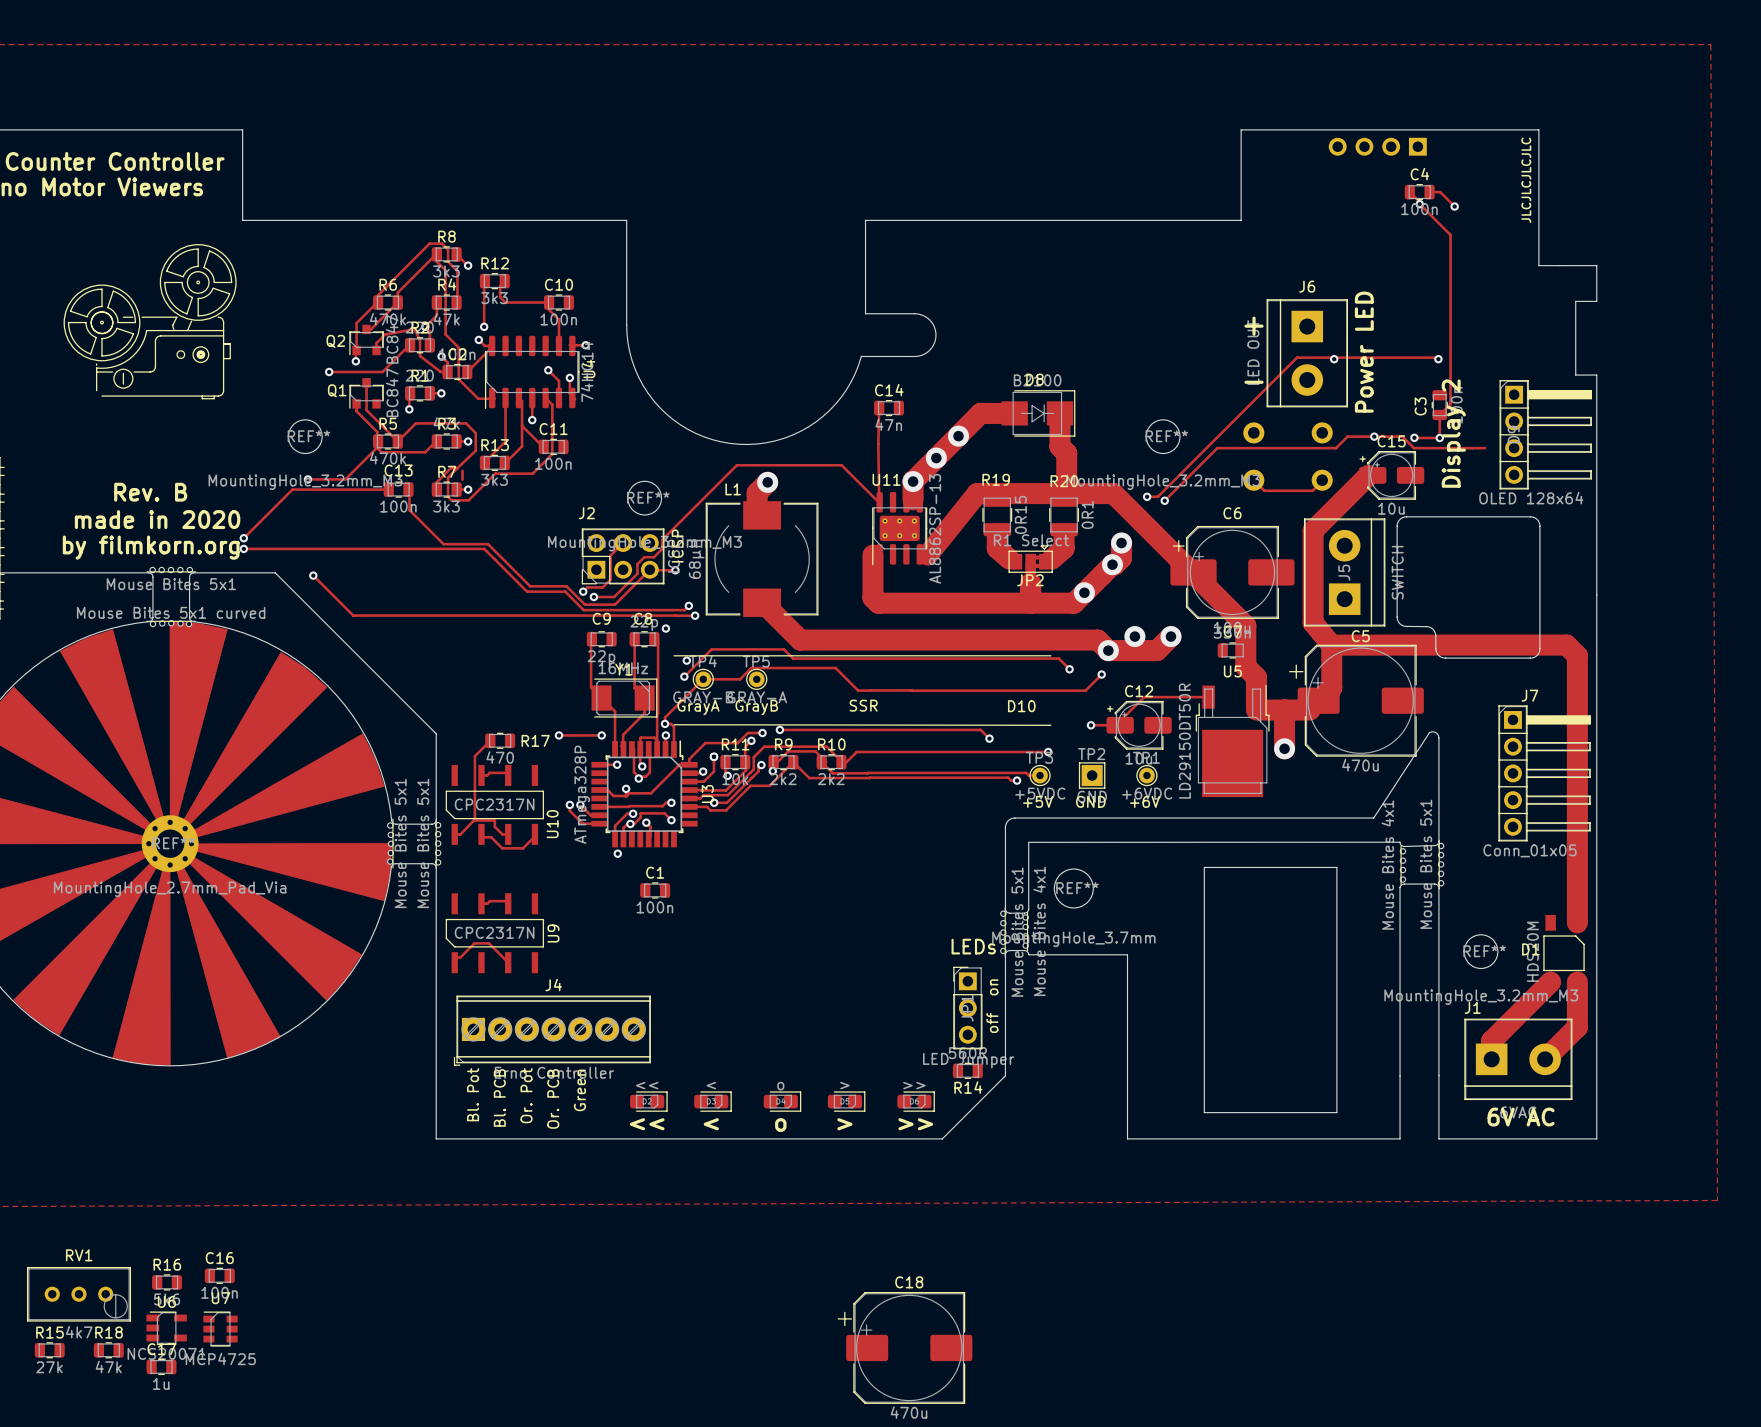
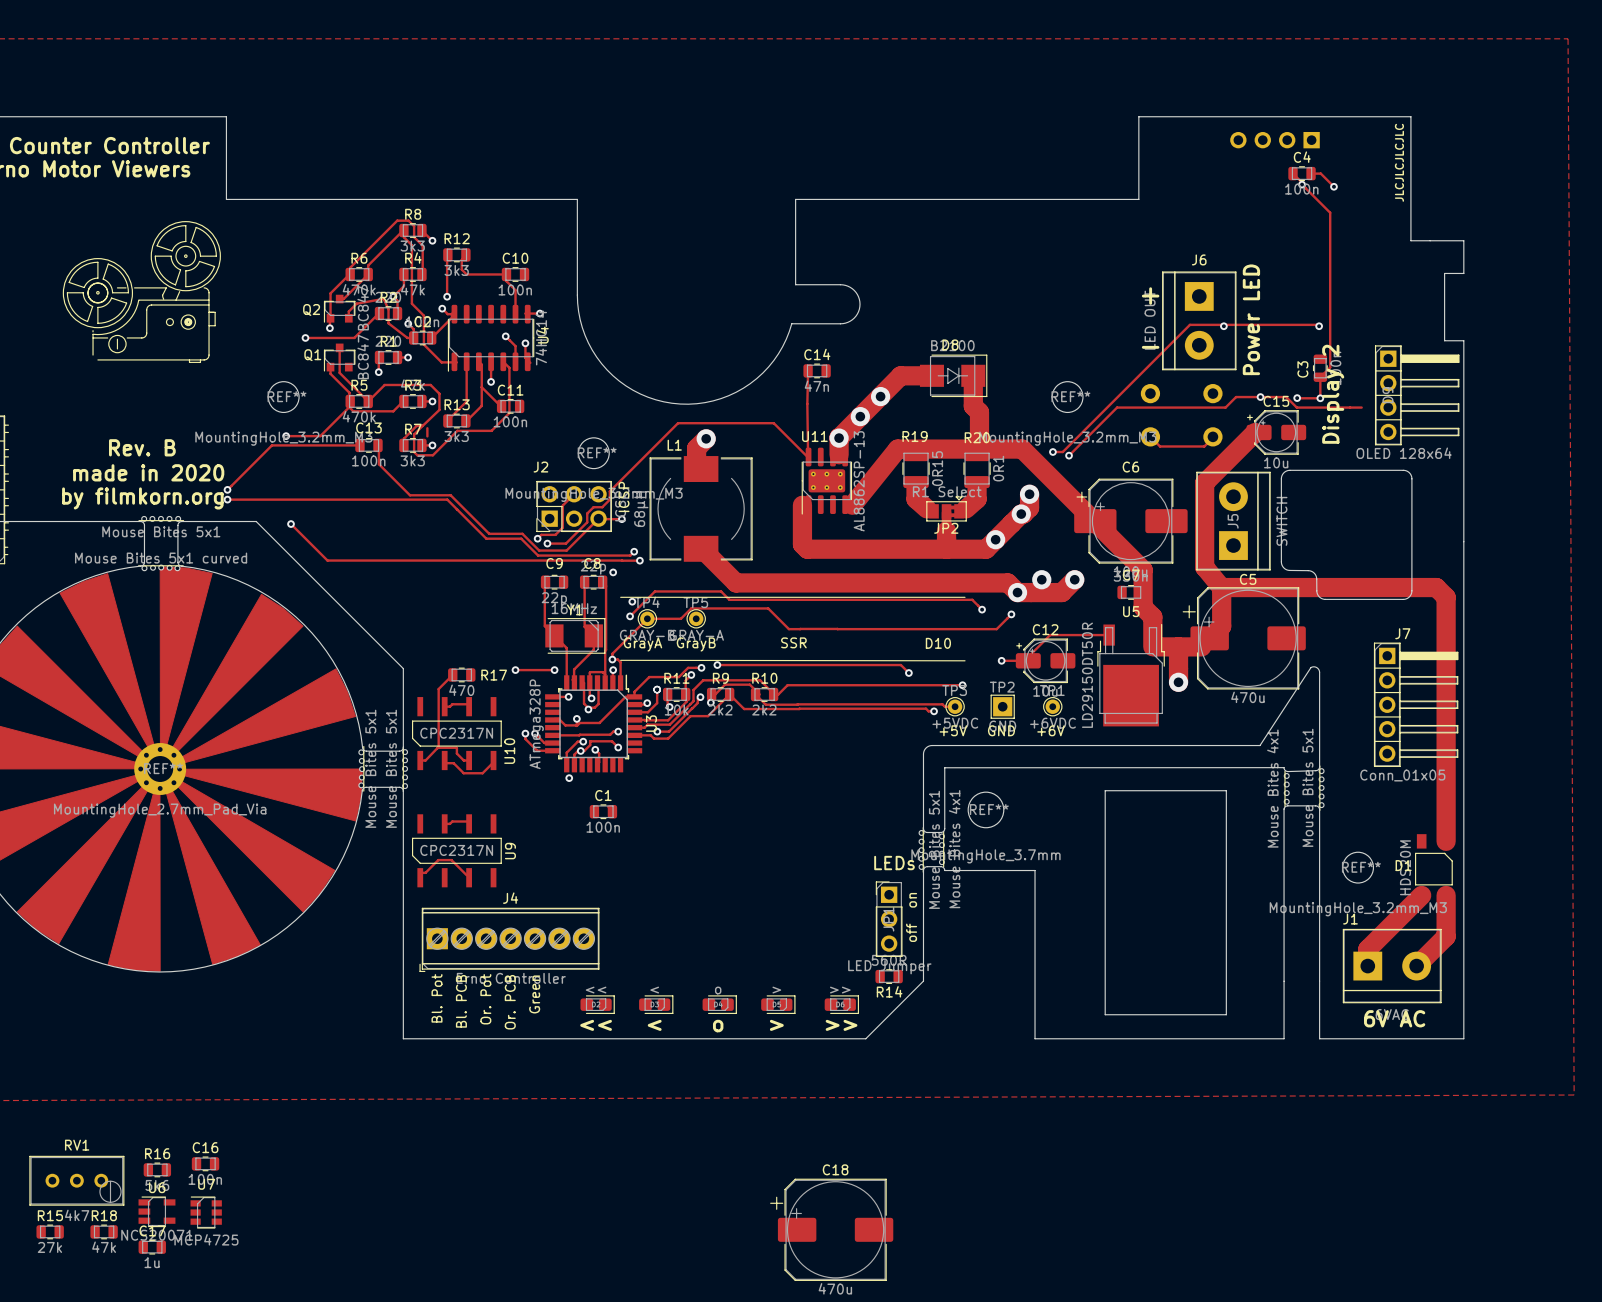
part position: (1377, 146) -> (1274, 140)

